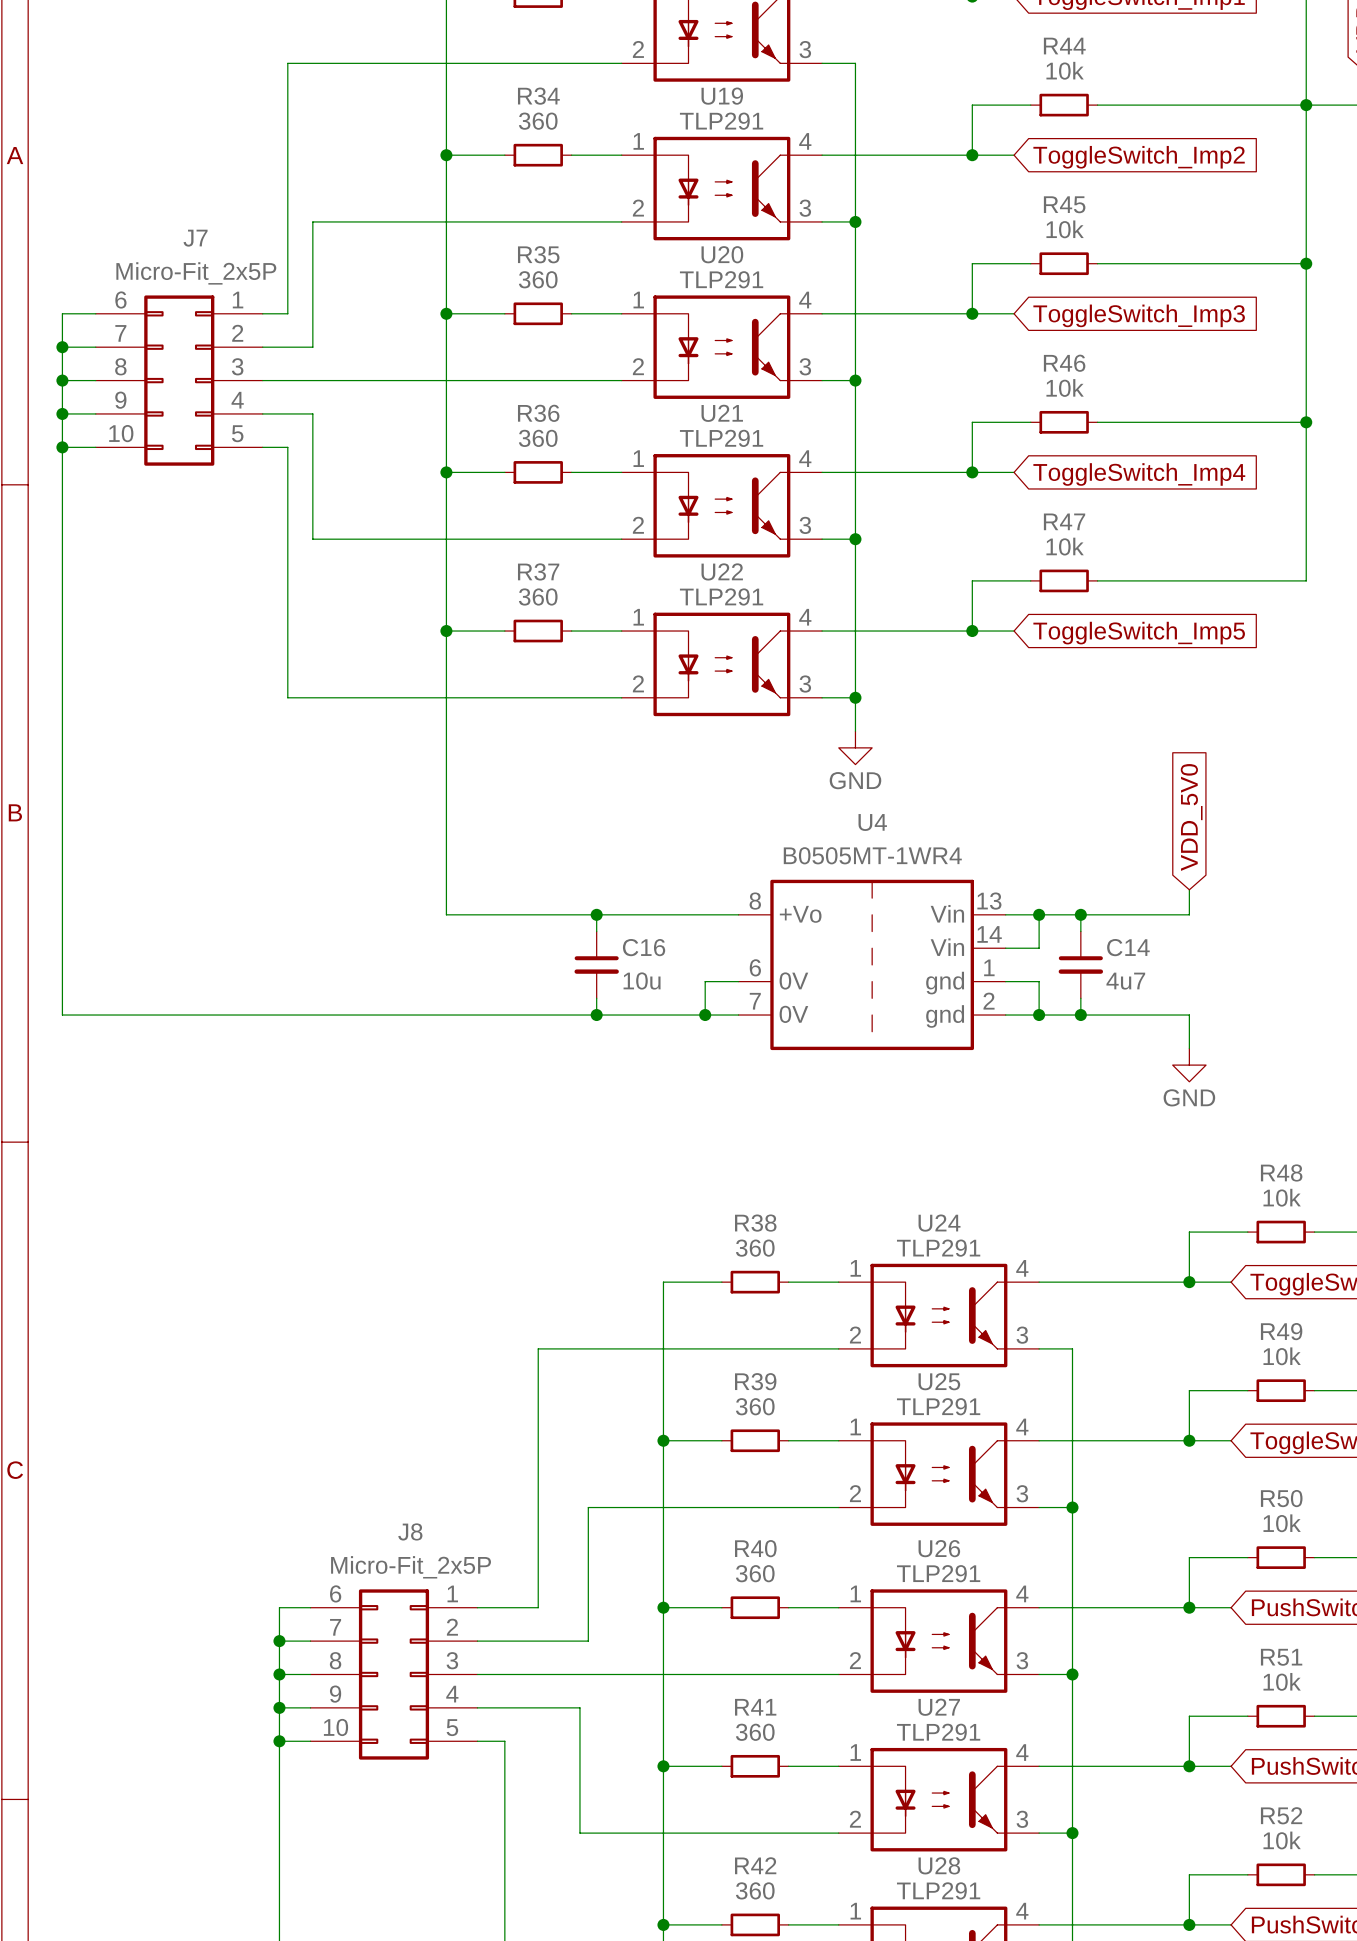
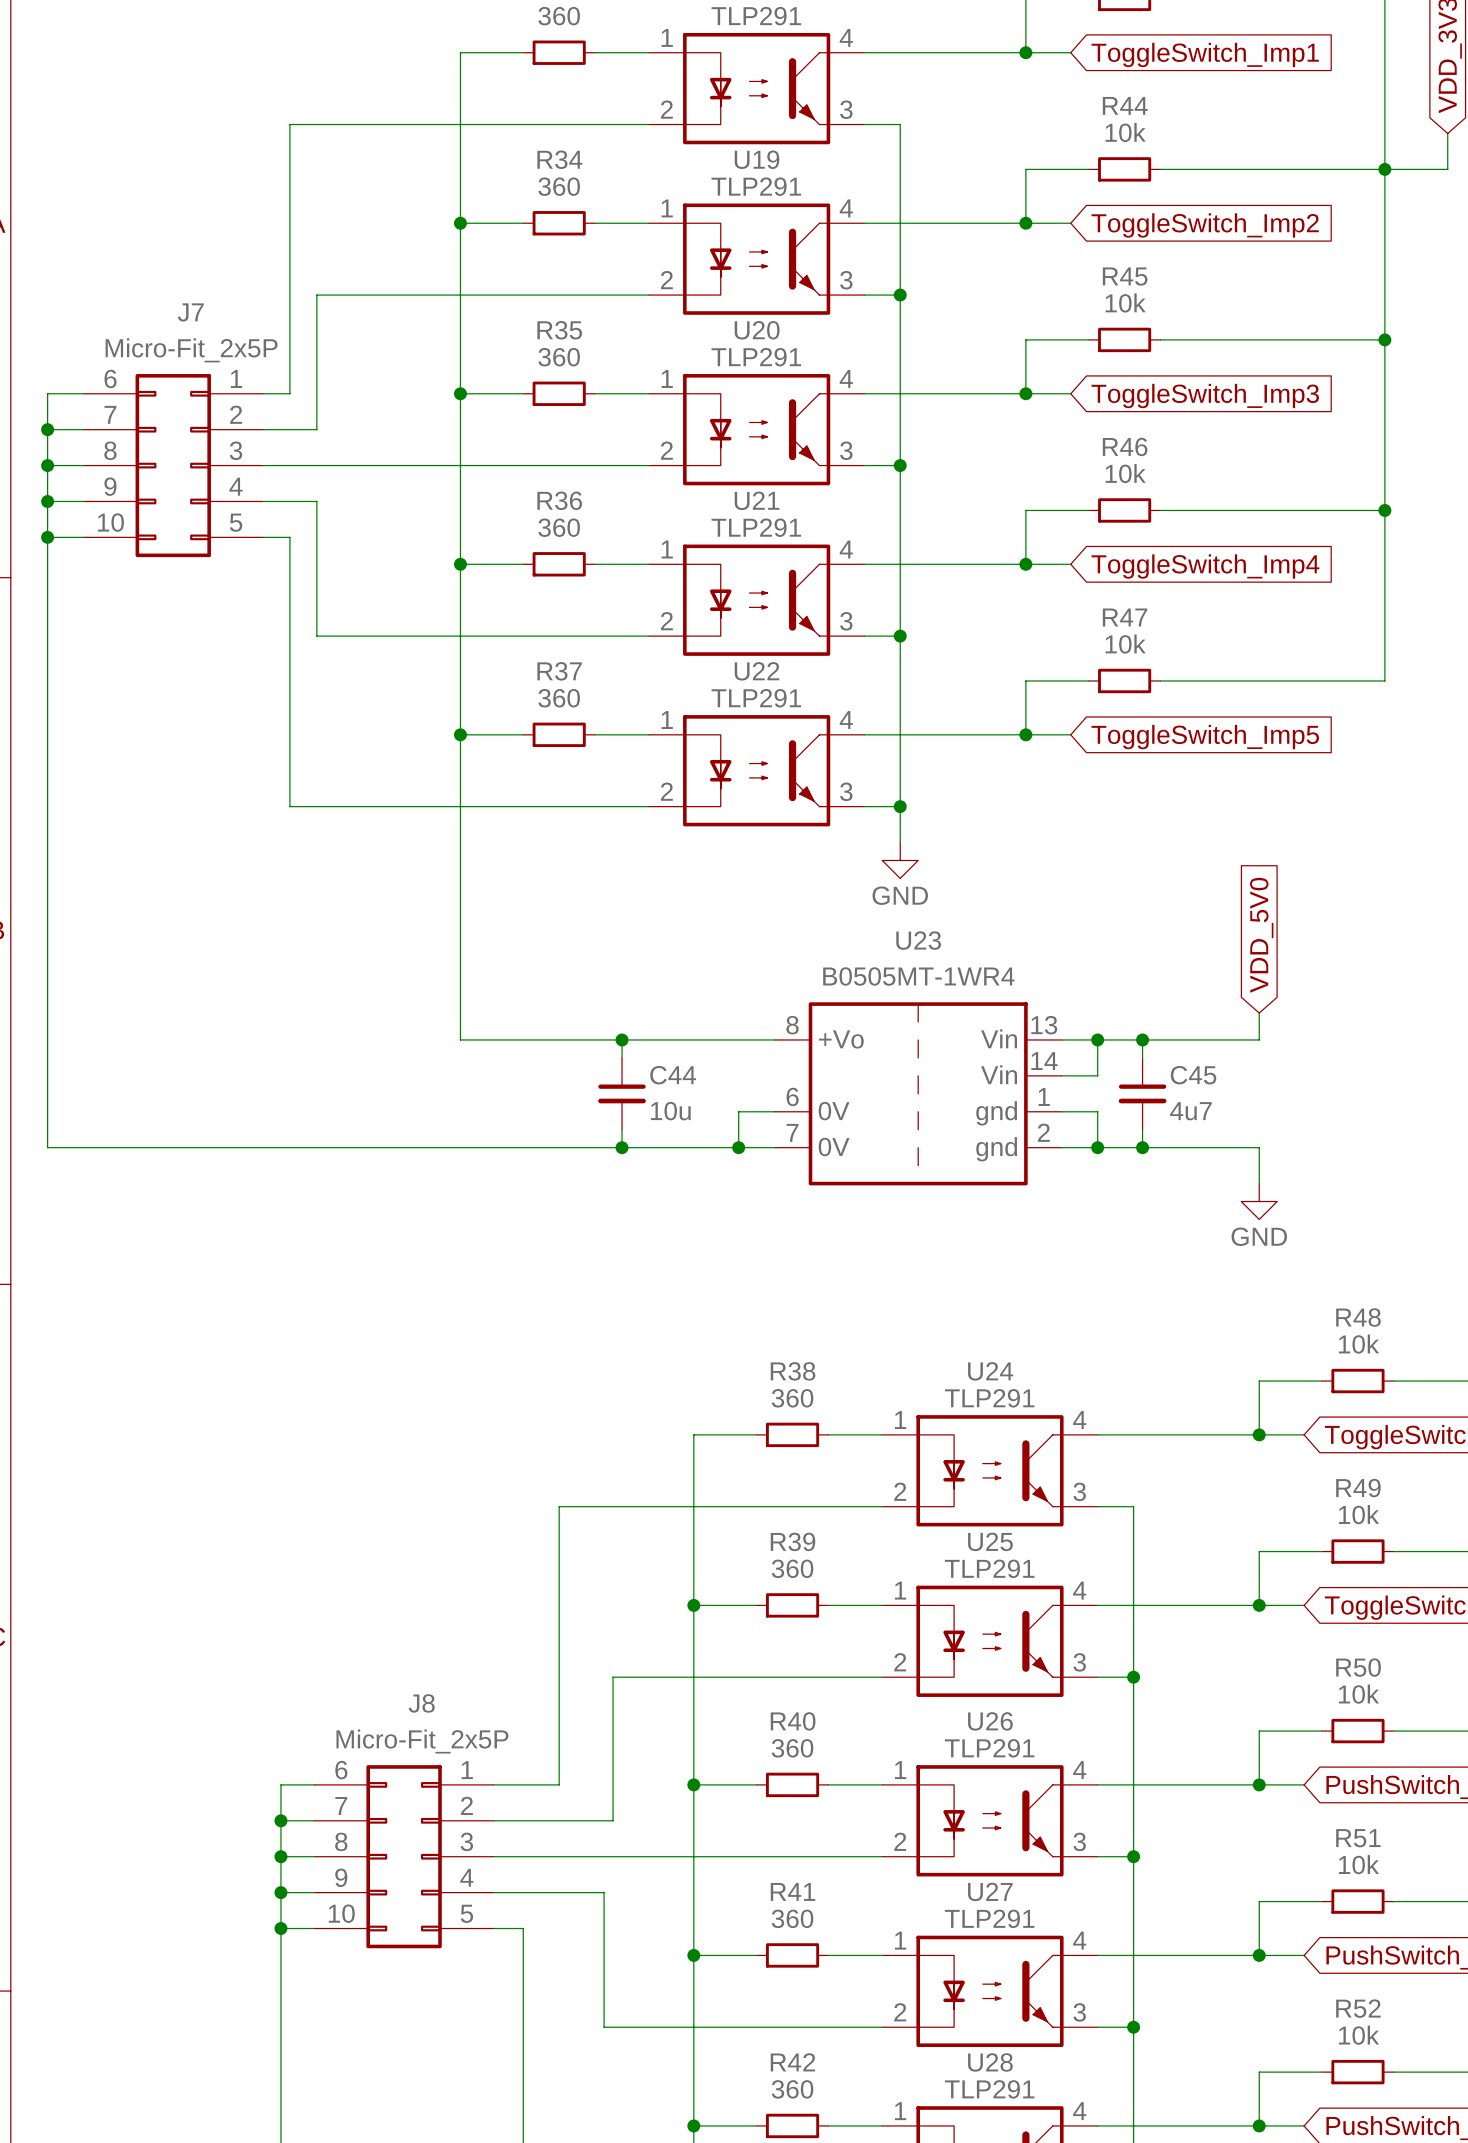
U4 name: U4 (872, 822) -> U23 (918, 940)
C16 name: C16 (644, 947) -> C44 (673, 1075)
C14 name: C14 (1128, 947) -> C45 (1193, 1075)

